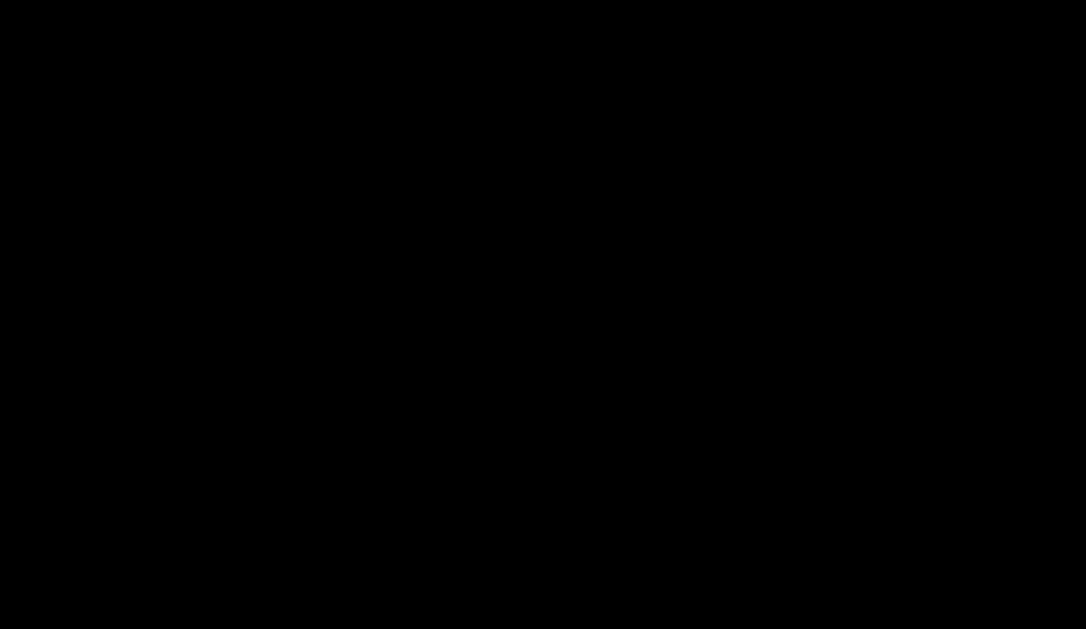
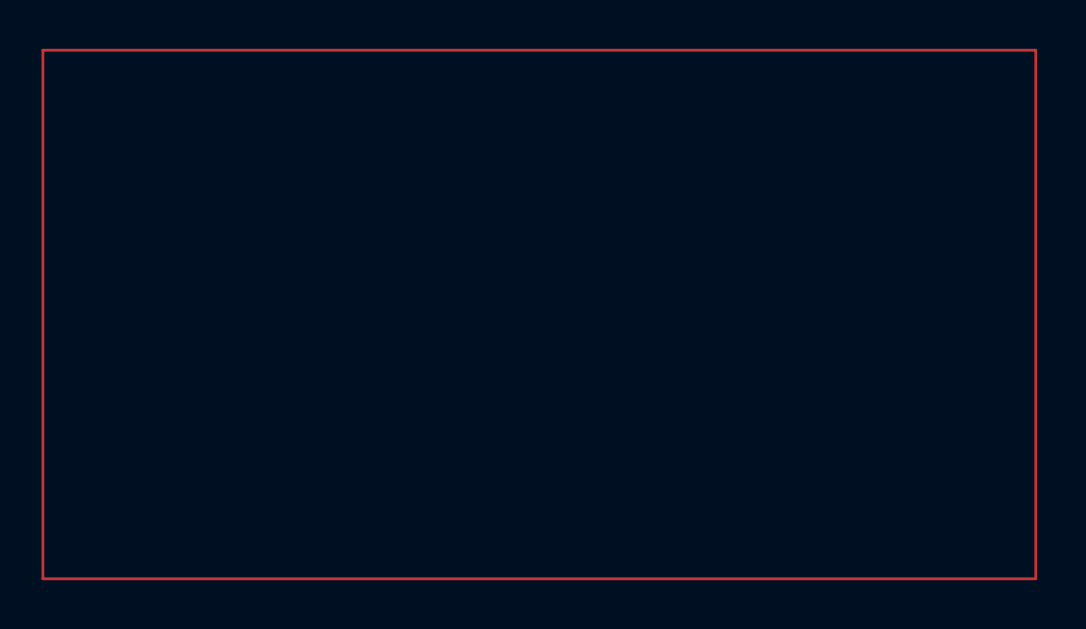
top track: none -> (1035, 50) (42, 50) (42, 578) (1035, 578) (1035, 50)

